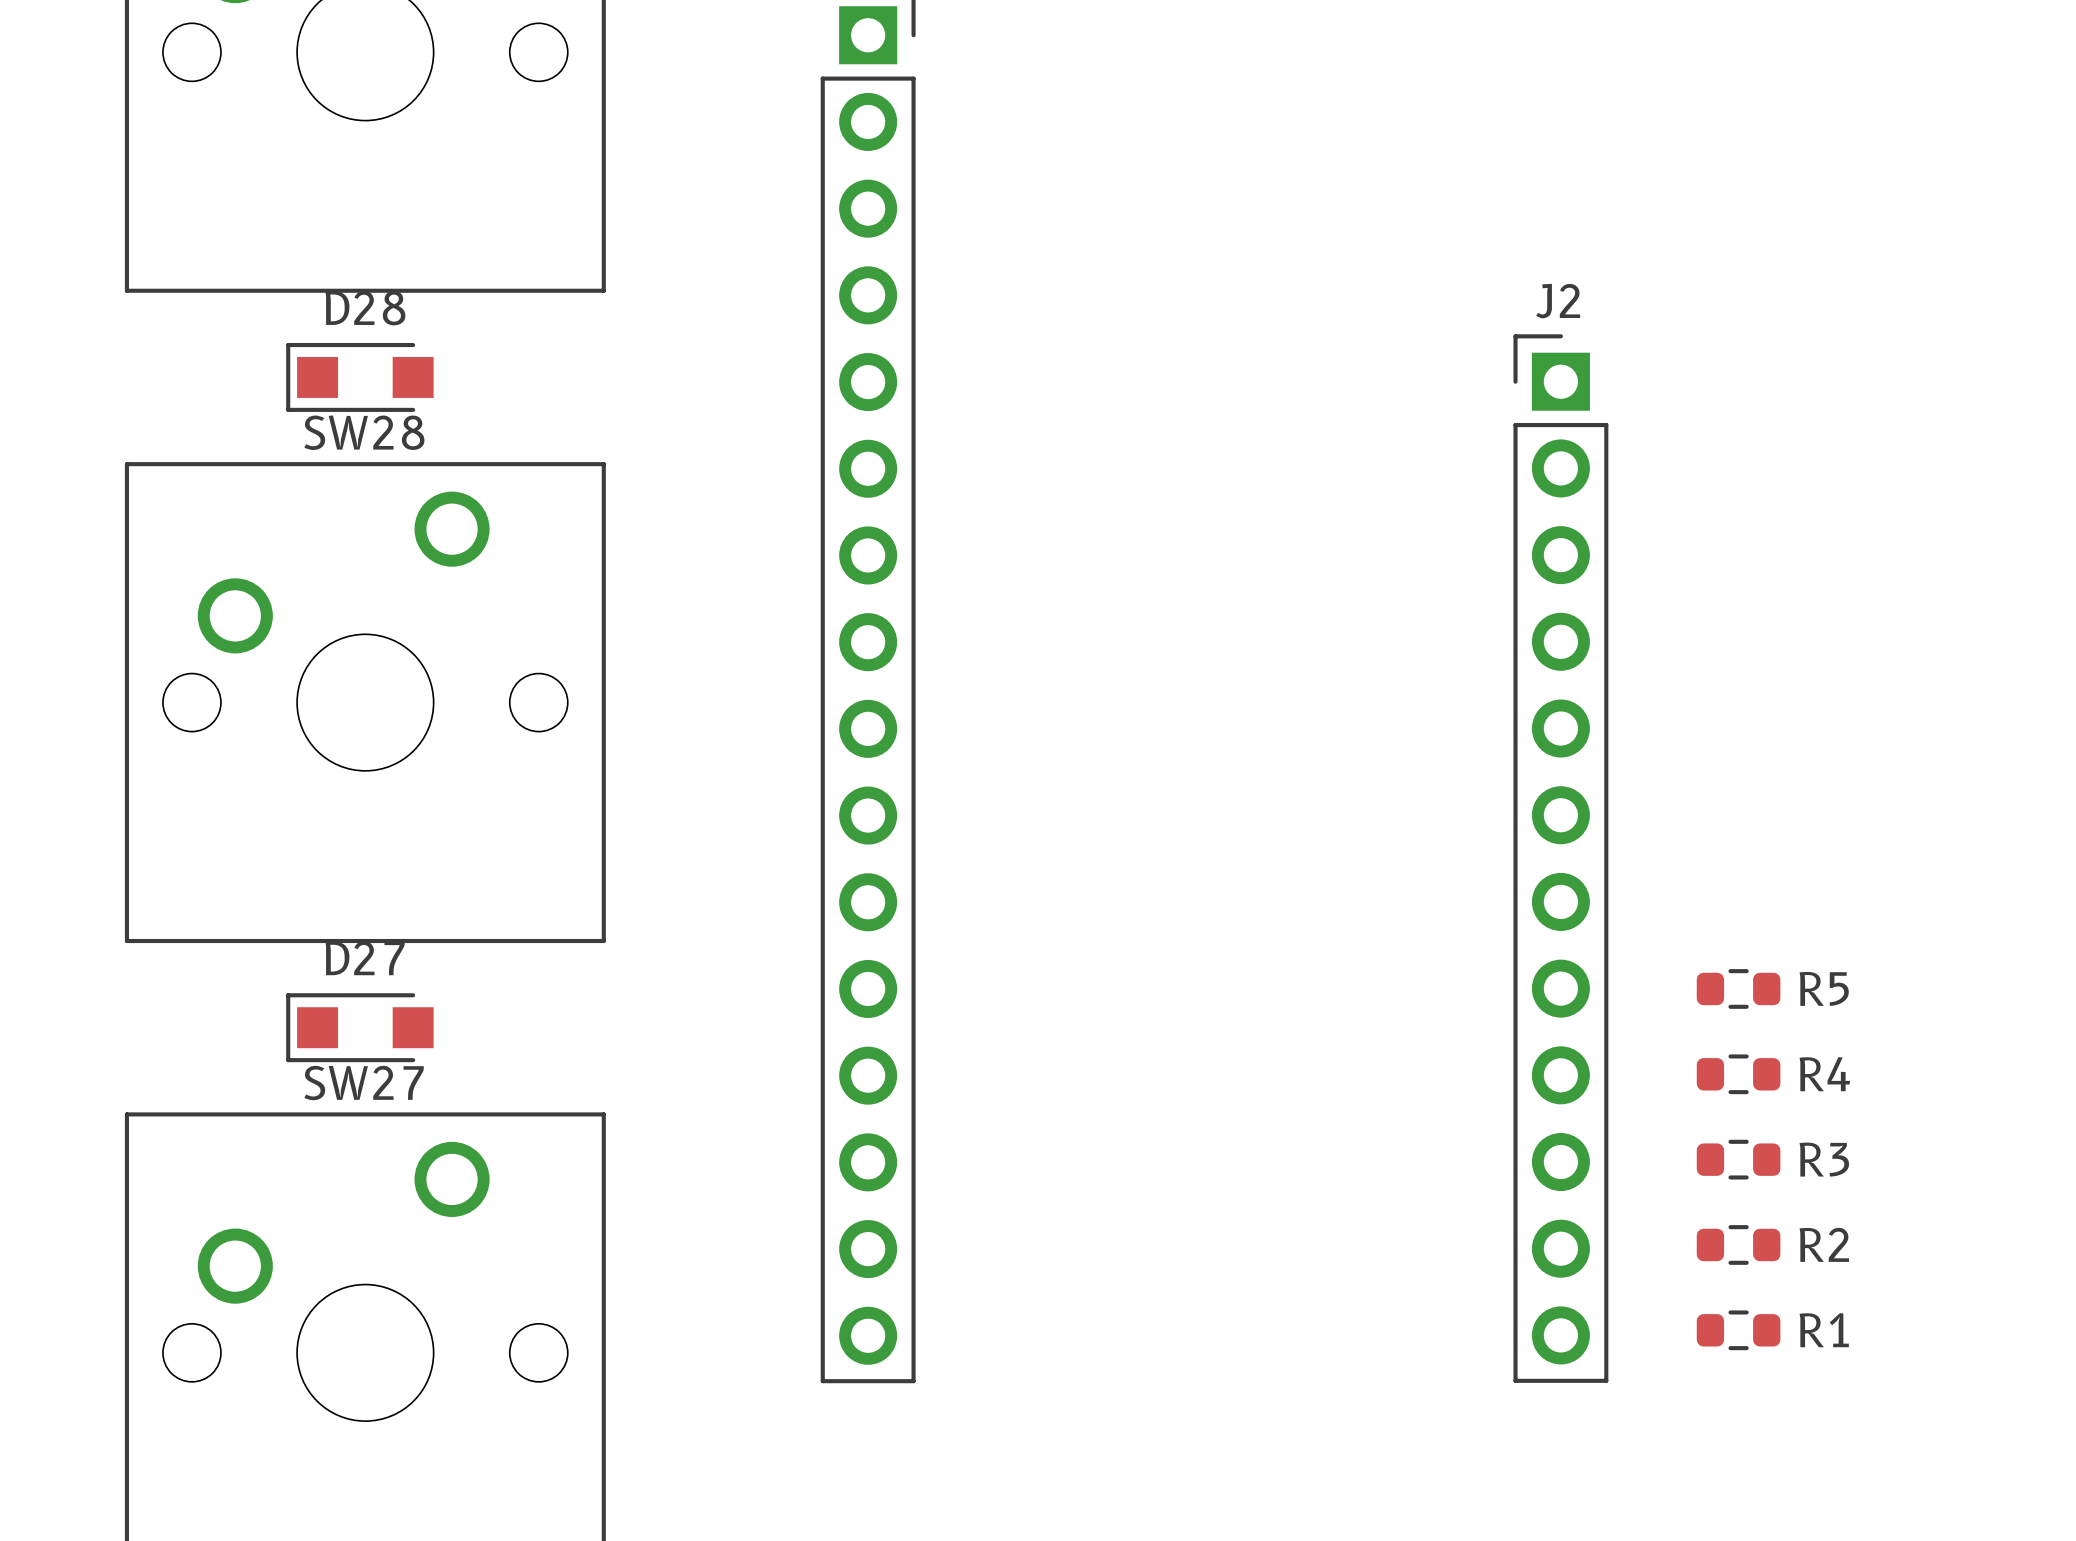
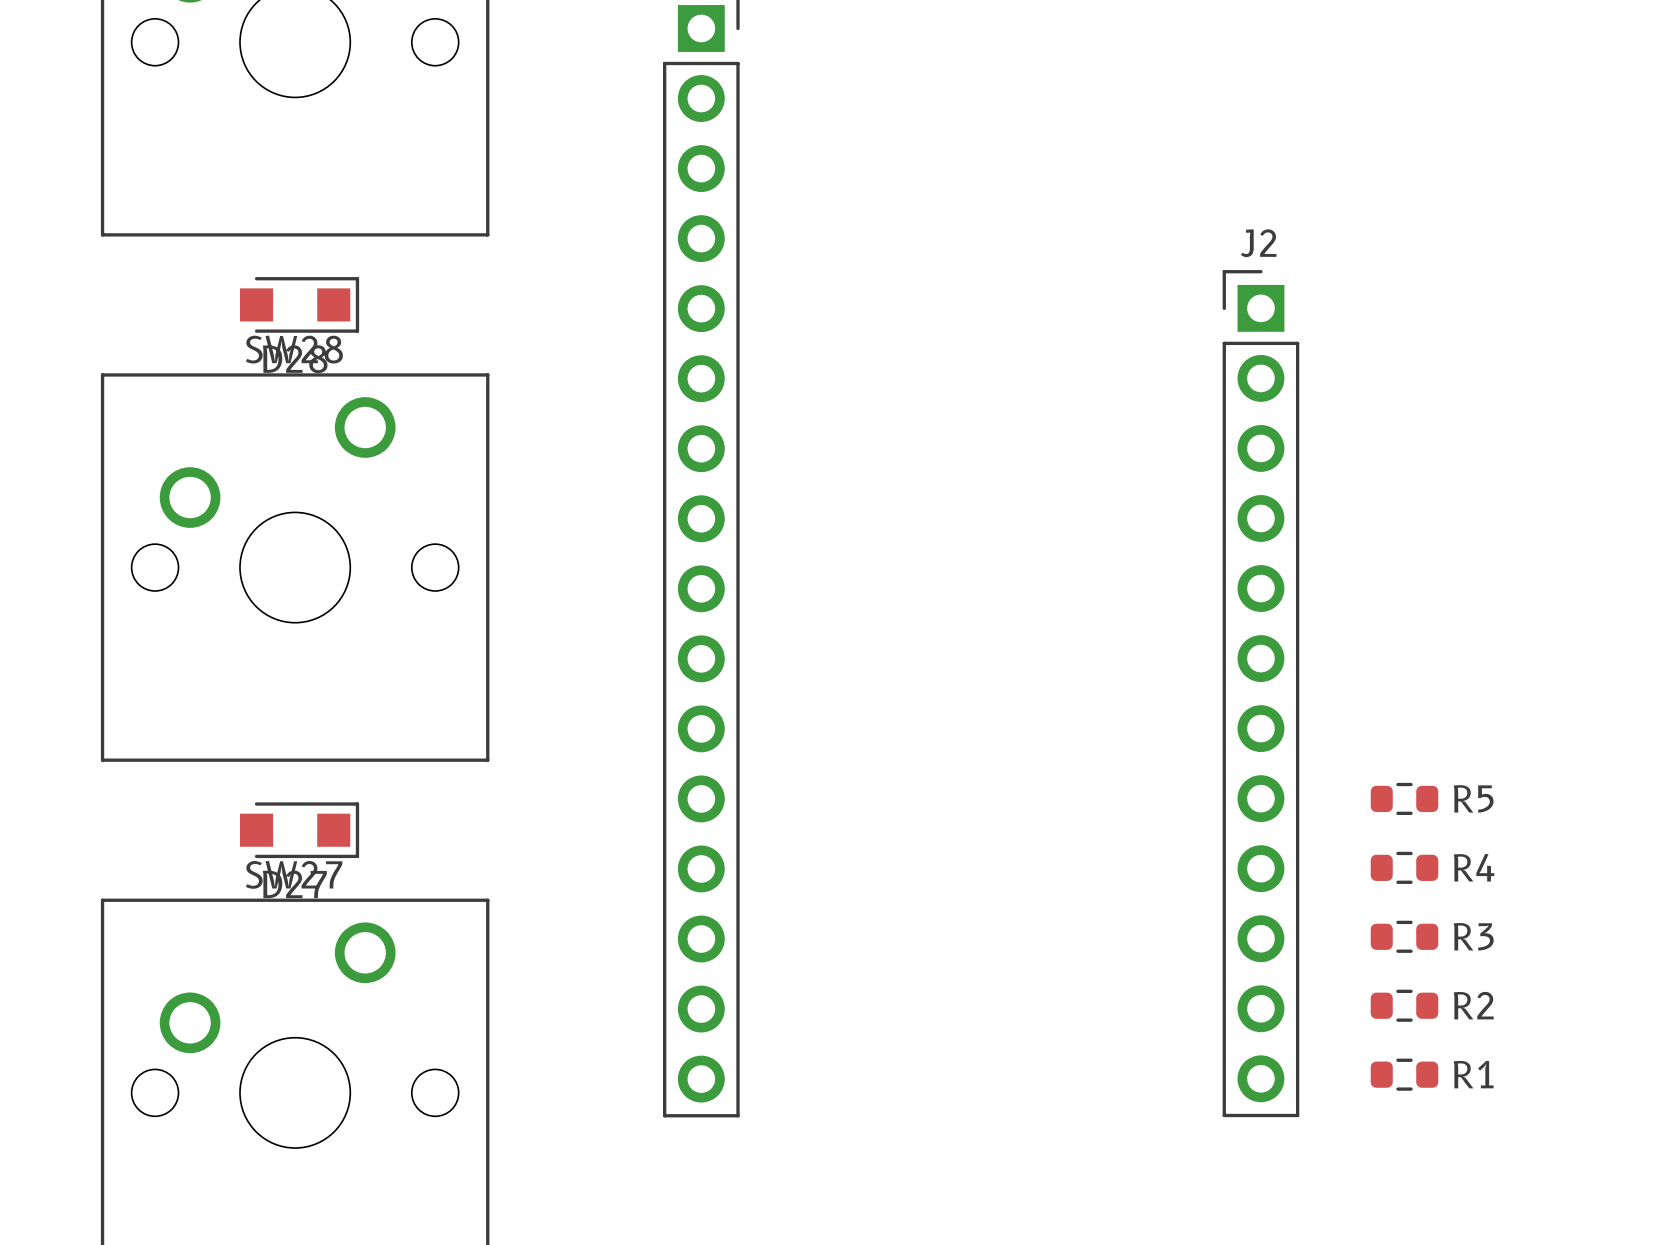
D28 rotation: 0° (359, 377) -> 180° (299, 304)
D27 rotation: 0° (359, 1027) -> 180° (299, 830)

